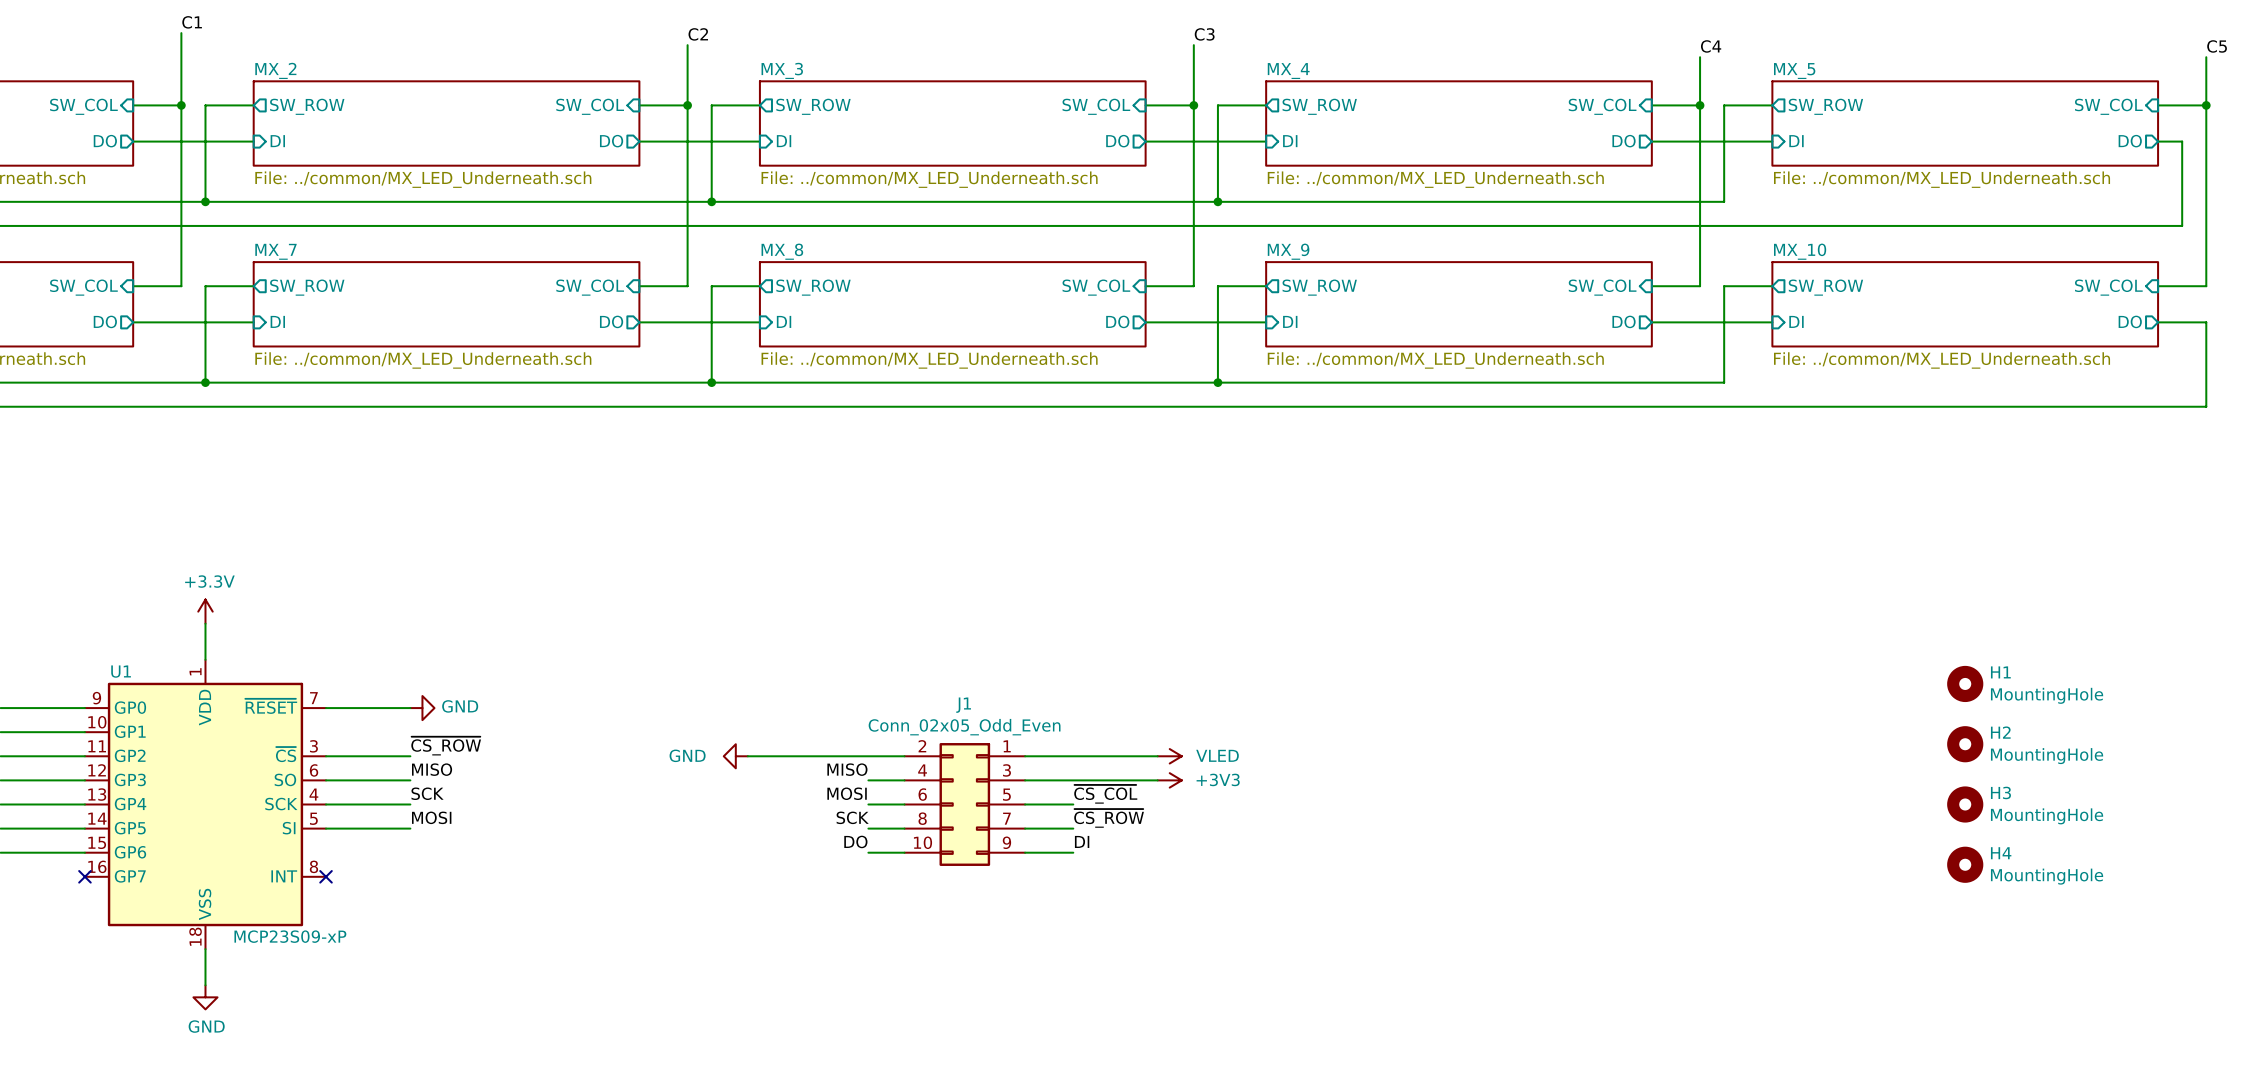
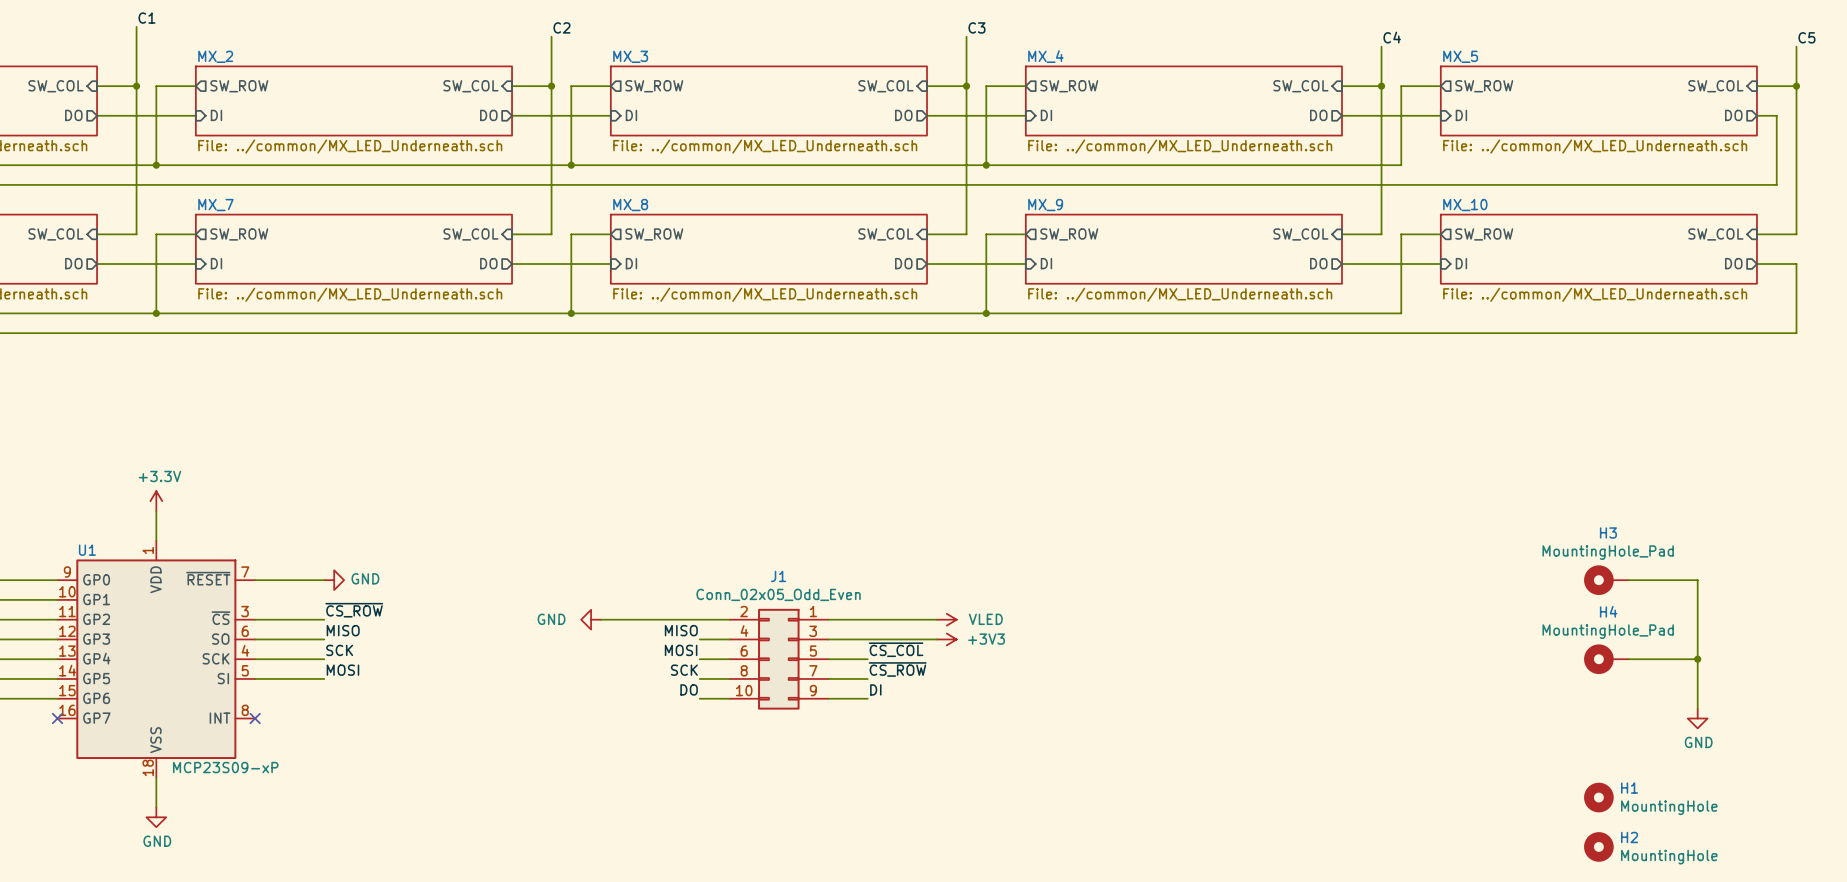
H1 position: (1965, 683) -> (1598, 797)
wire: none -> (1628, 580) (1697, 580) (1697, 708)
H2 position: (1965, 744) -> (1598, 846)
H3 symbol: [1947, 786, 1984, 823] -> [1584, 565, 1629, 595]
H3 name position: H3 (2000, 792) -> H3 (1608, 532)
wire: none -> (1628, 659) (1697, 659)
junction: none -> (1697, 659)
H3 value: MountingHole (2047, 816) -> MountingHole_Pad (1608, 552)
H4 symbol: [1947, 846, 1984, 883] -> [1584, 644, 1629, 675]
H4 name position: H4 (2001, 853) -> H4 (1608, 611)
H4 value: MountingHole (2047, 876) -> MountingHole_Pad (1608, 631)
power symbol: none -> GND (1697, 718)

